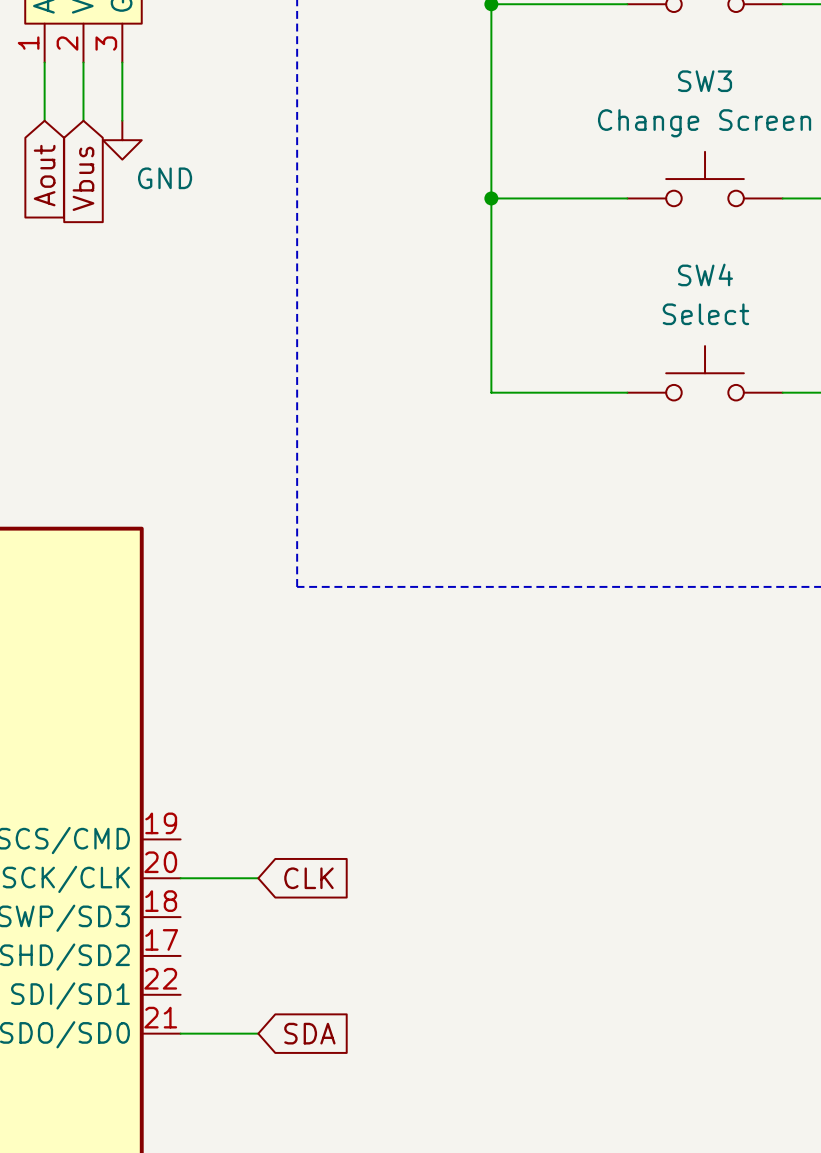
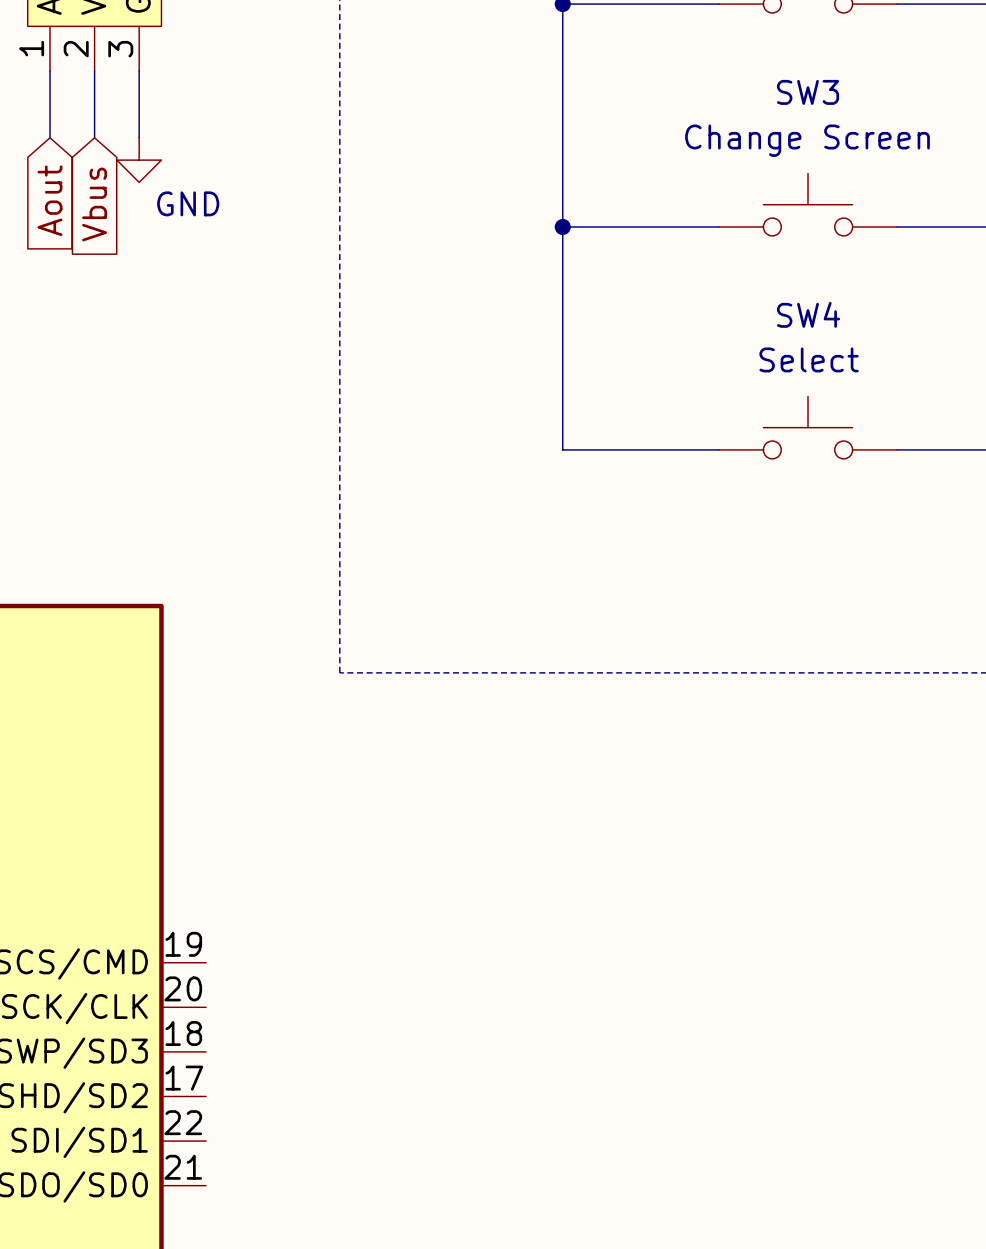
wire: (180, 878) (258, 878) -> none
global label: CLK (308, 878) -> none
wire: (180, 1033) (258, 1033) -> none
global label: SDA (309, 1033) -> none

